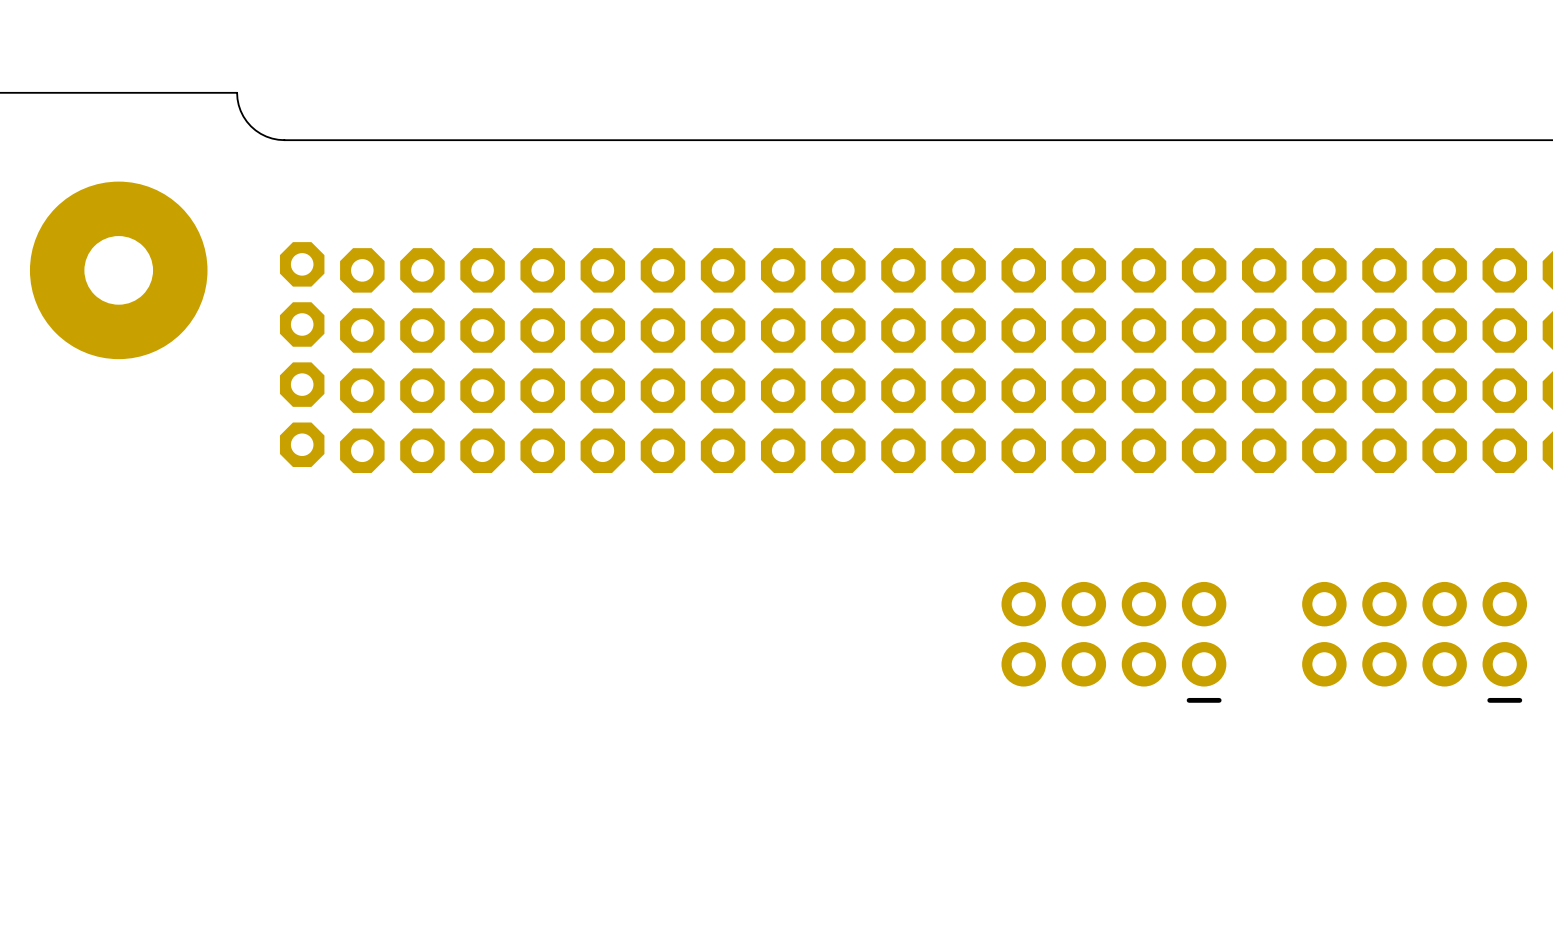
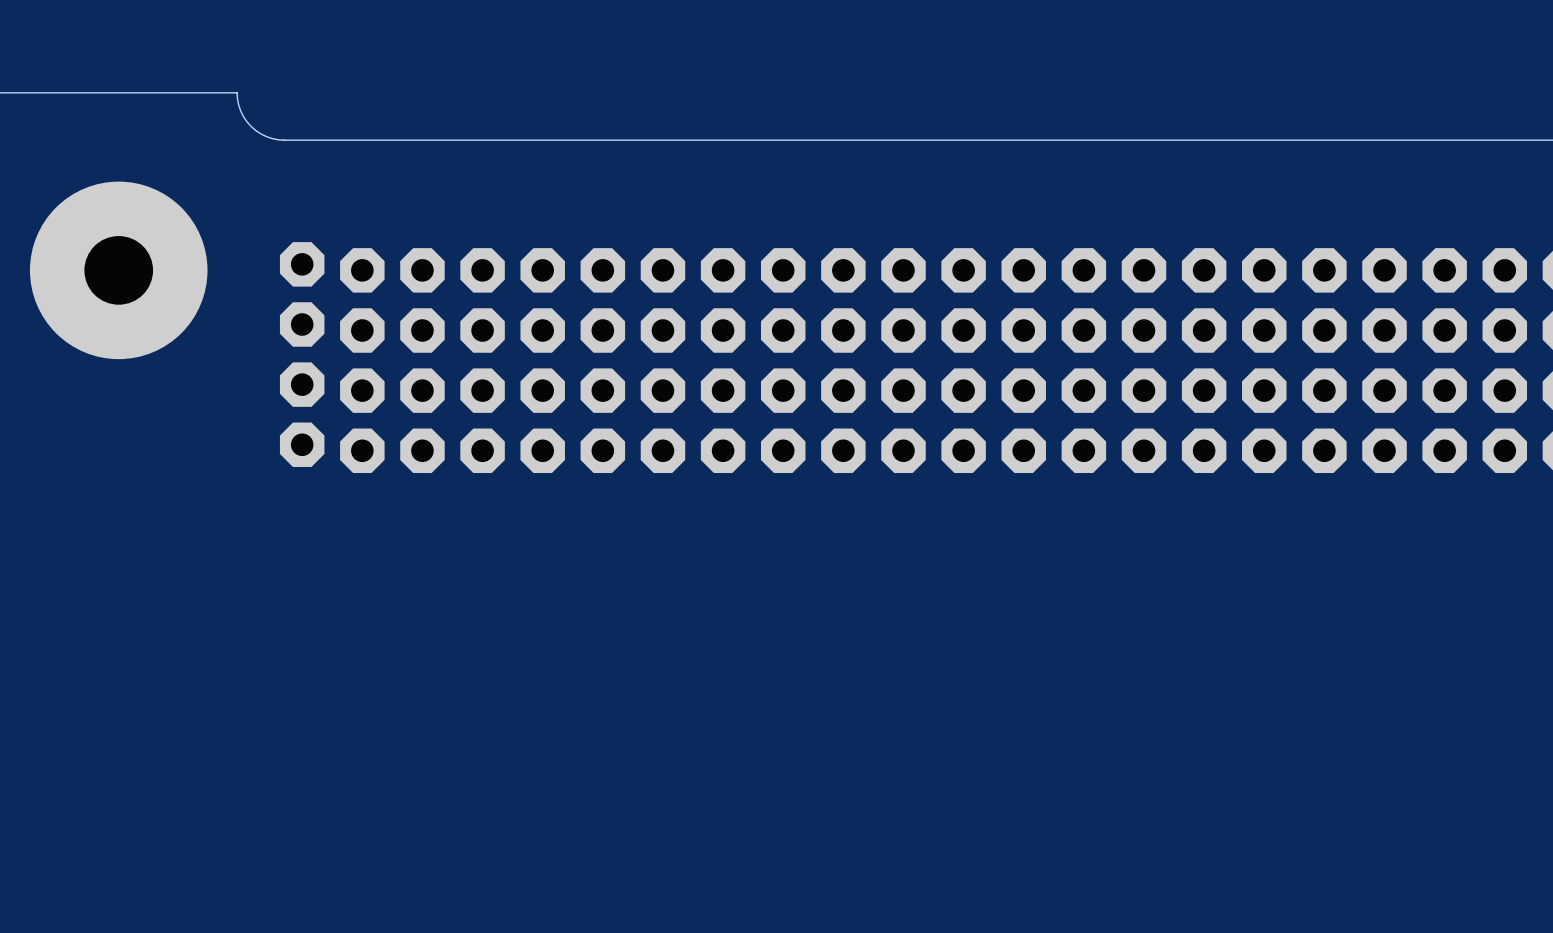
part: (1113, 642) -> none
part: (1414, 642) -> none

